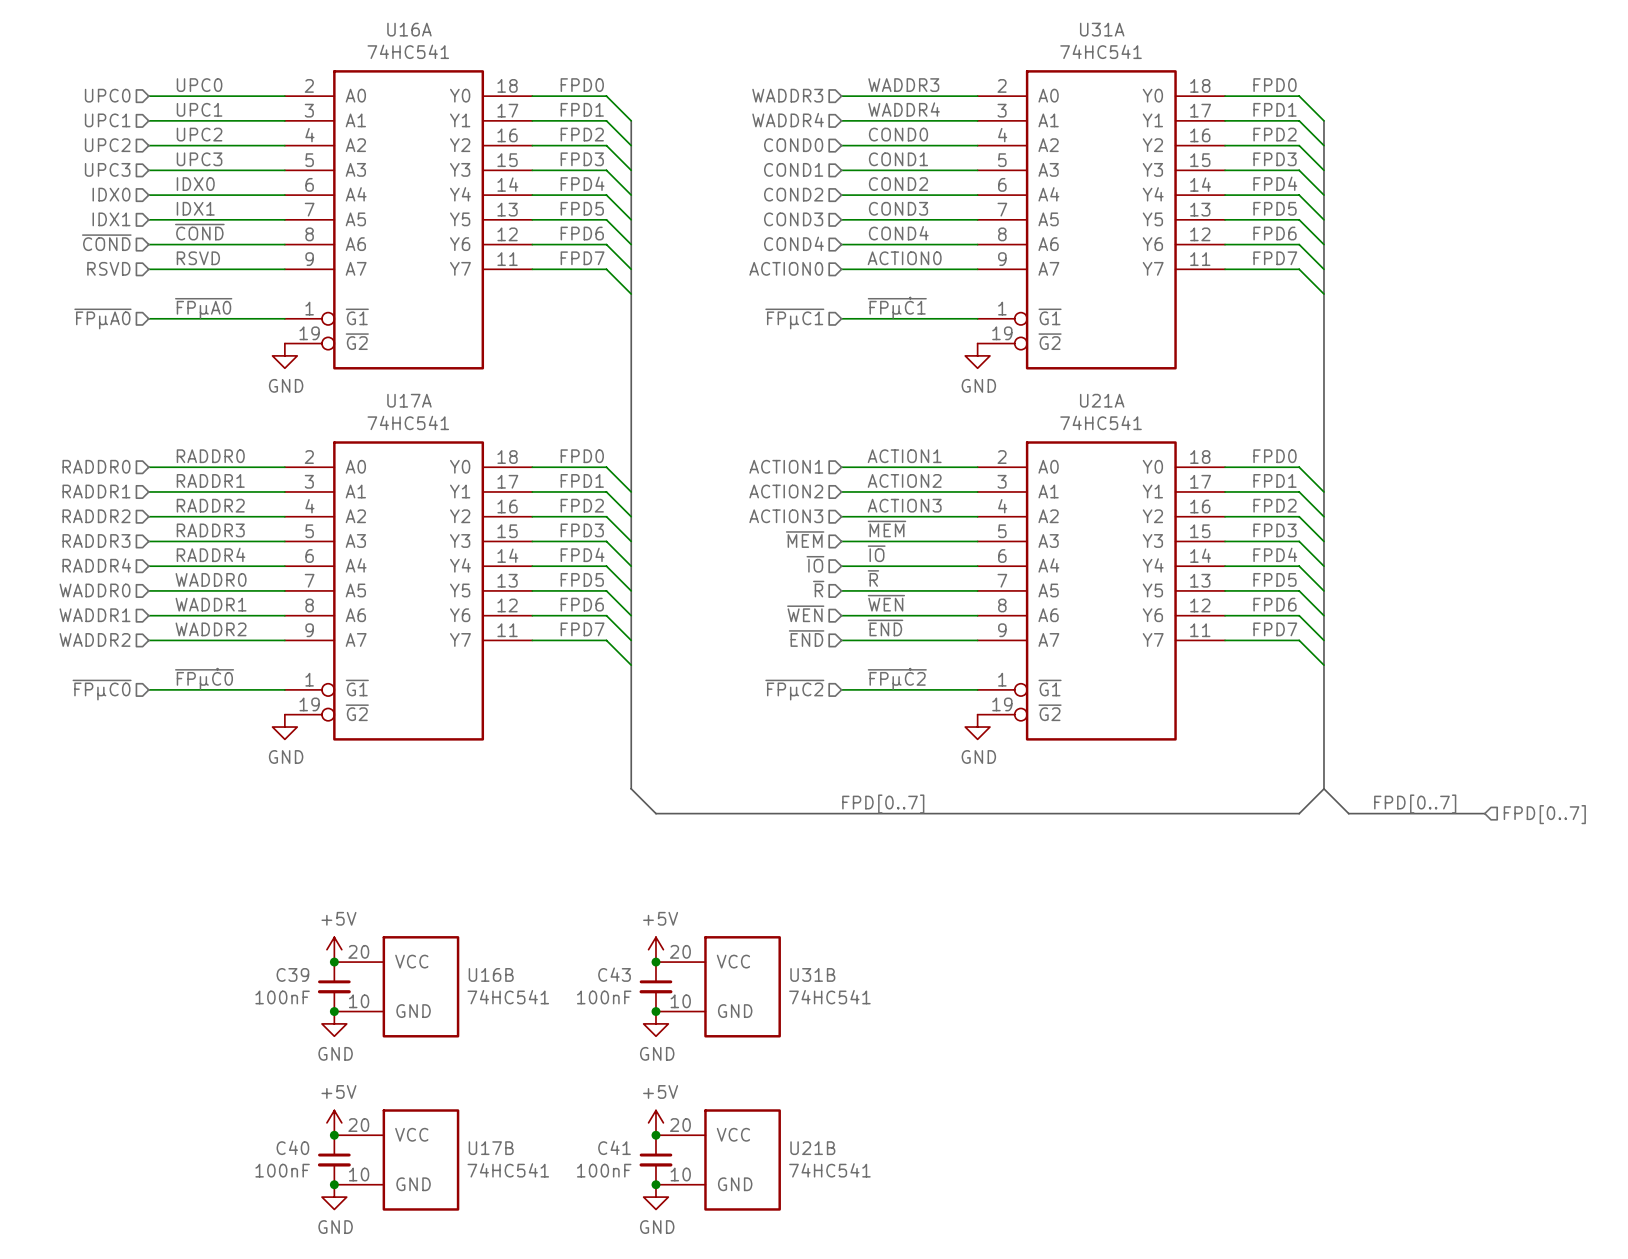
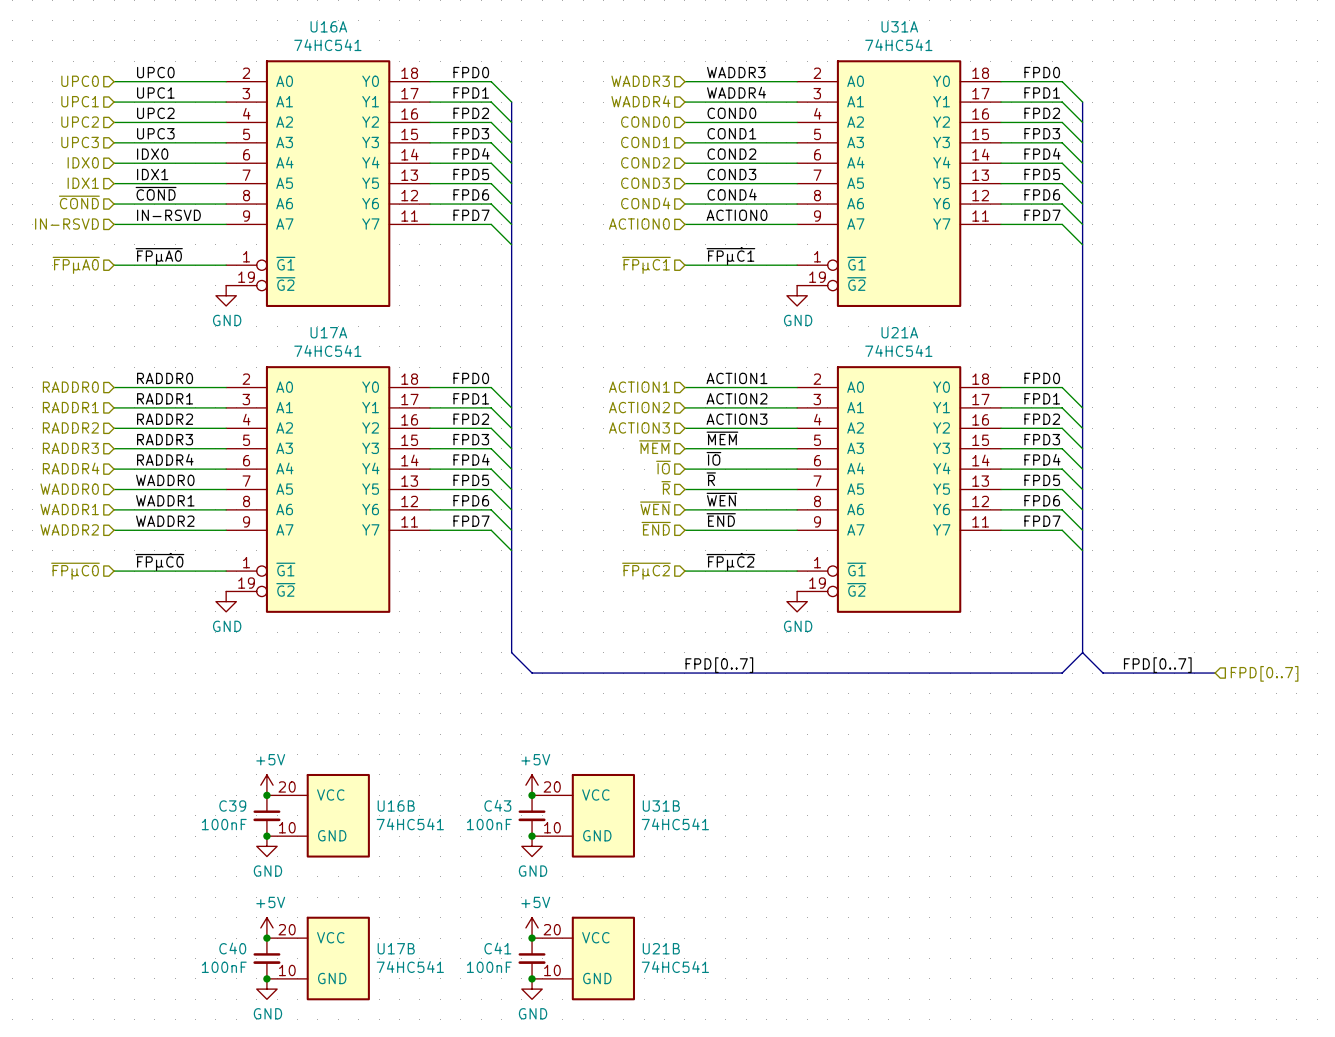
label: RSVD (198, 258) -> IN-RSVD (168, 215)
hierarchical label: RSVD (108, 268) -> IN-RSVD (66, 224)

